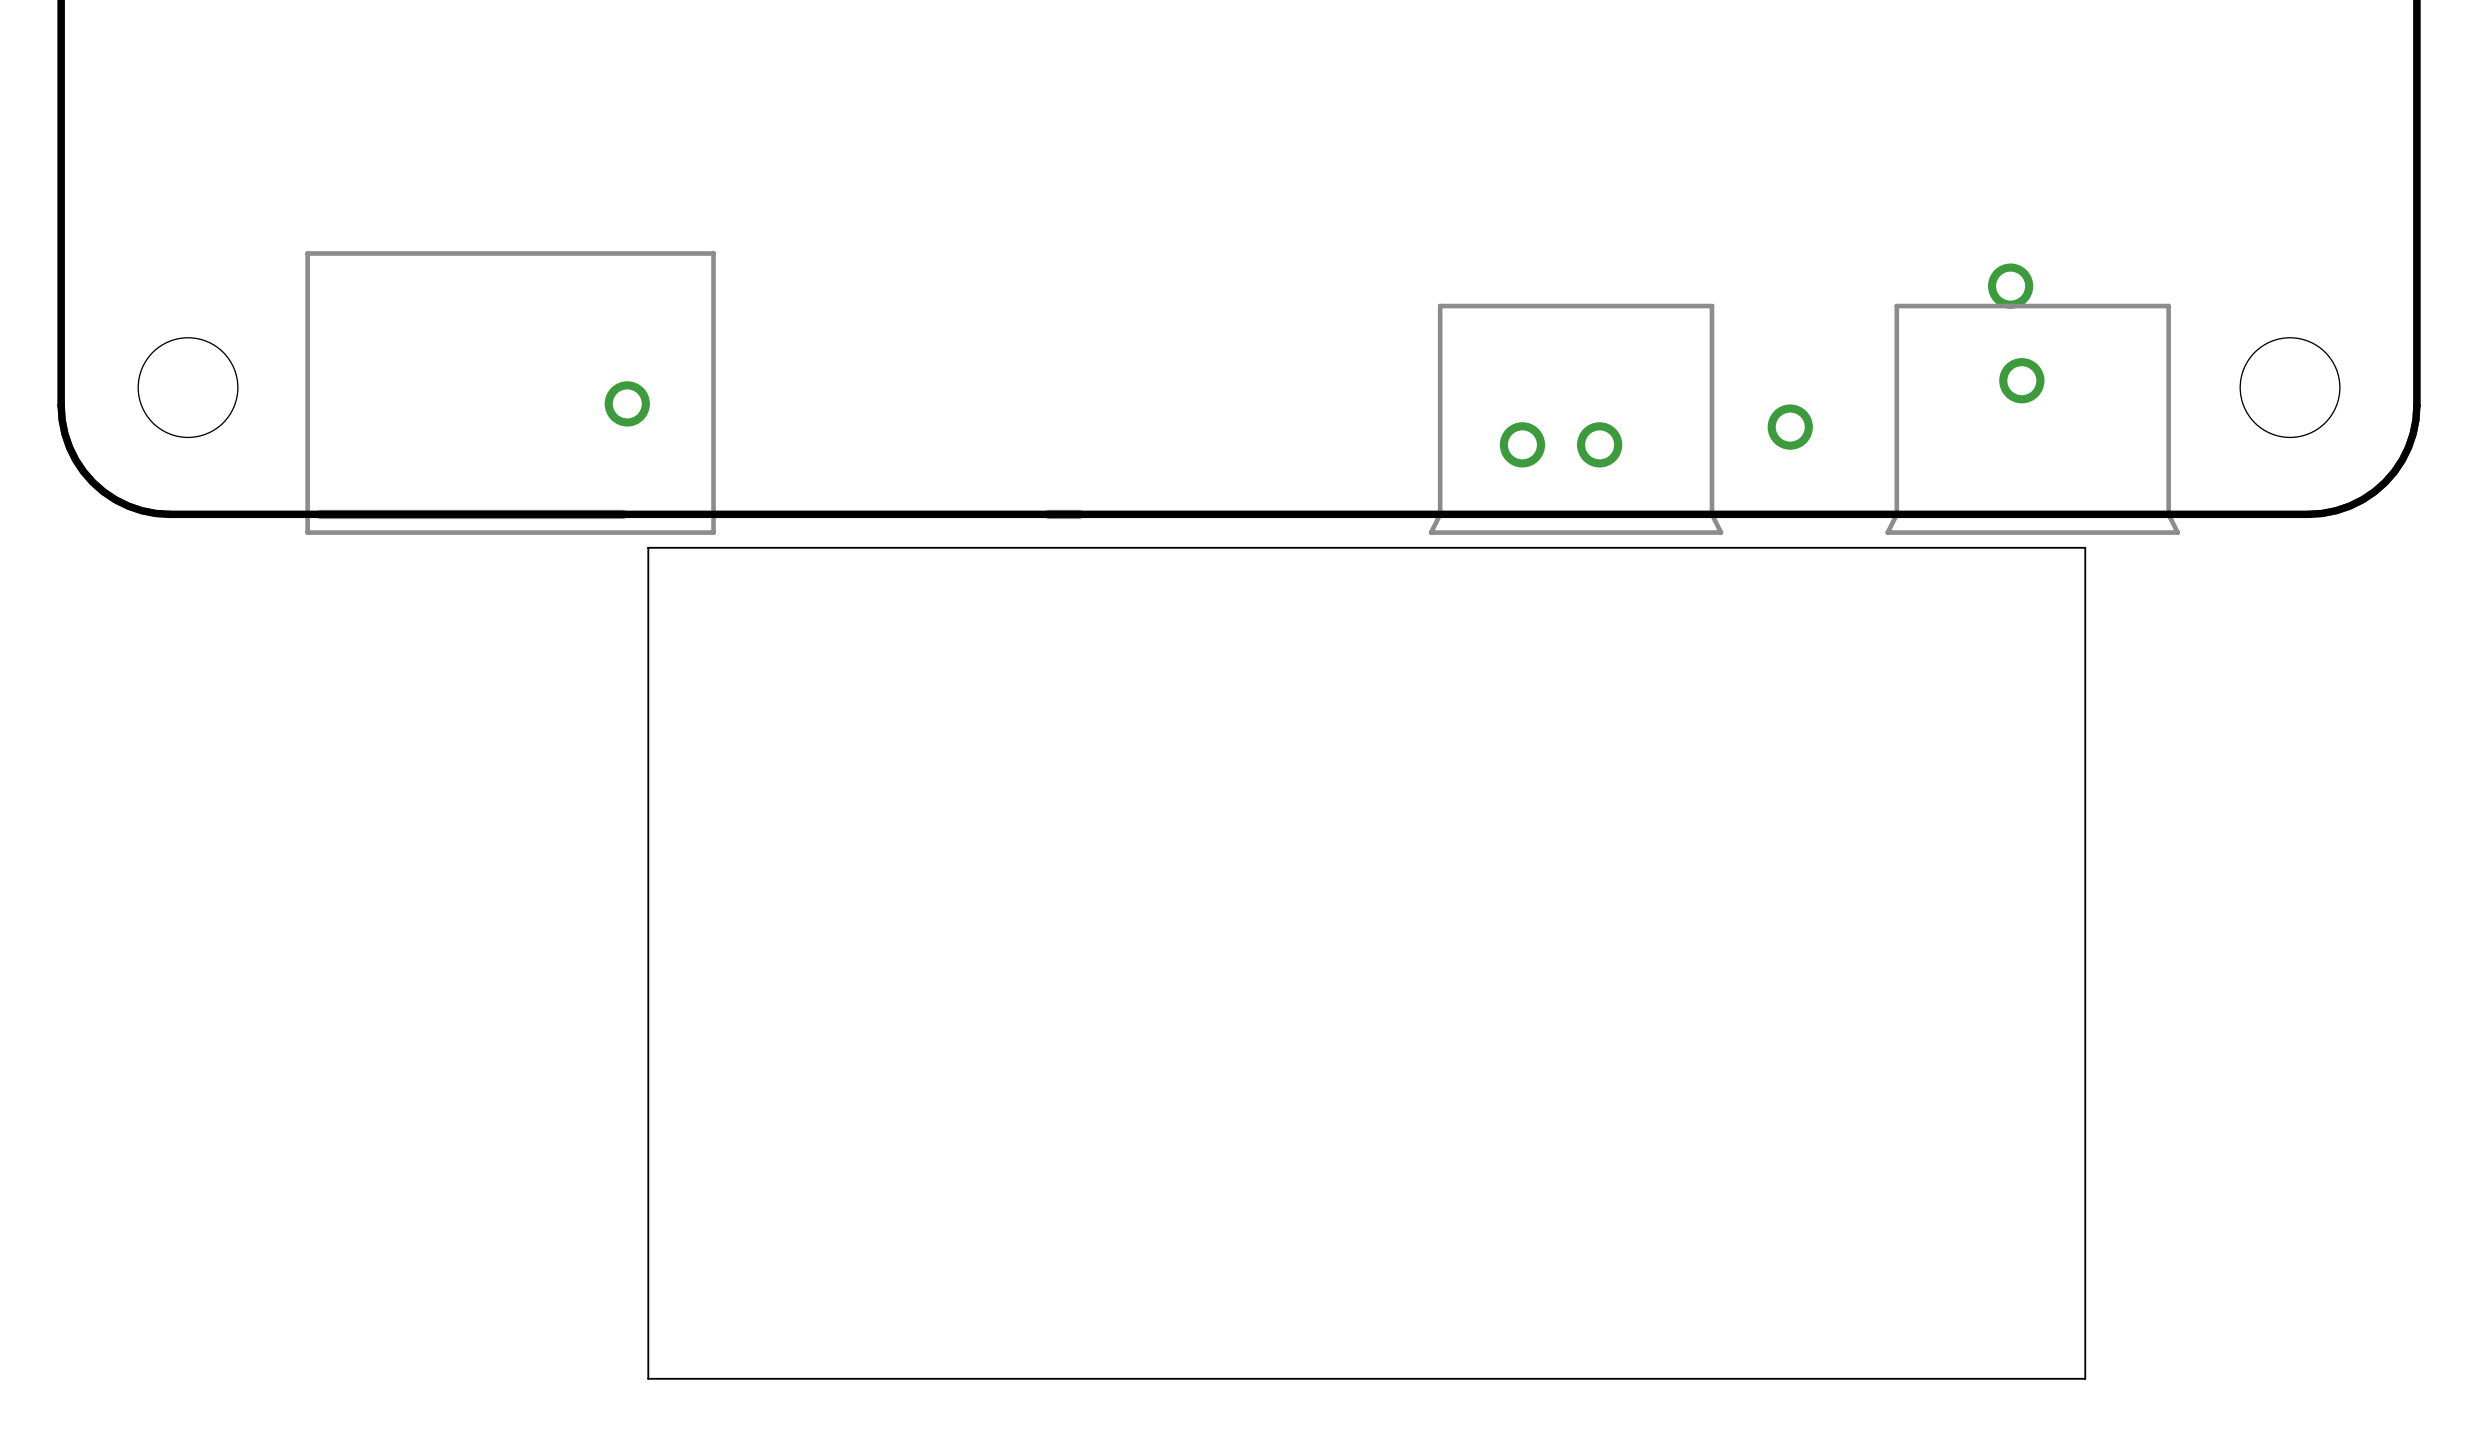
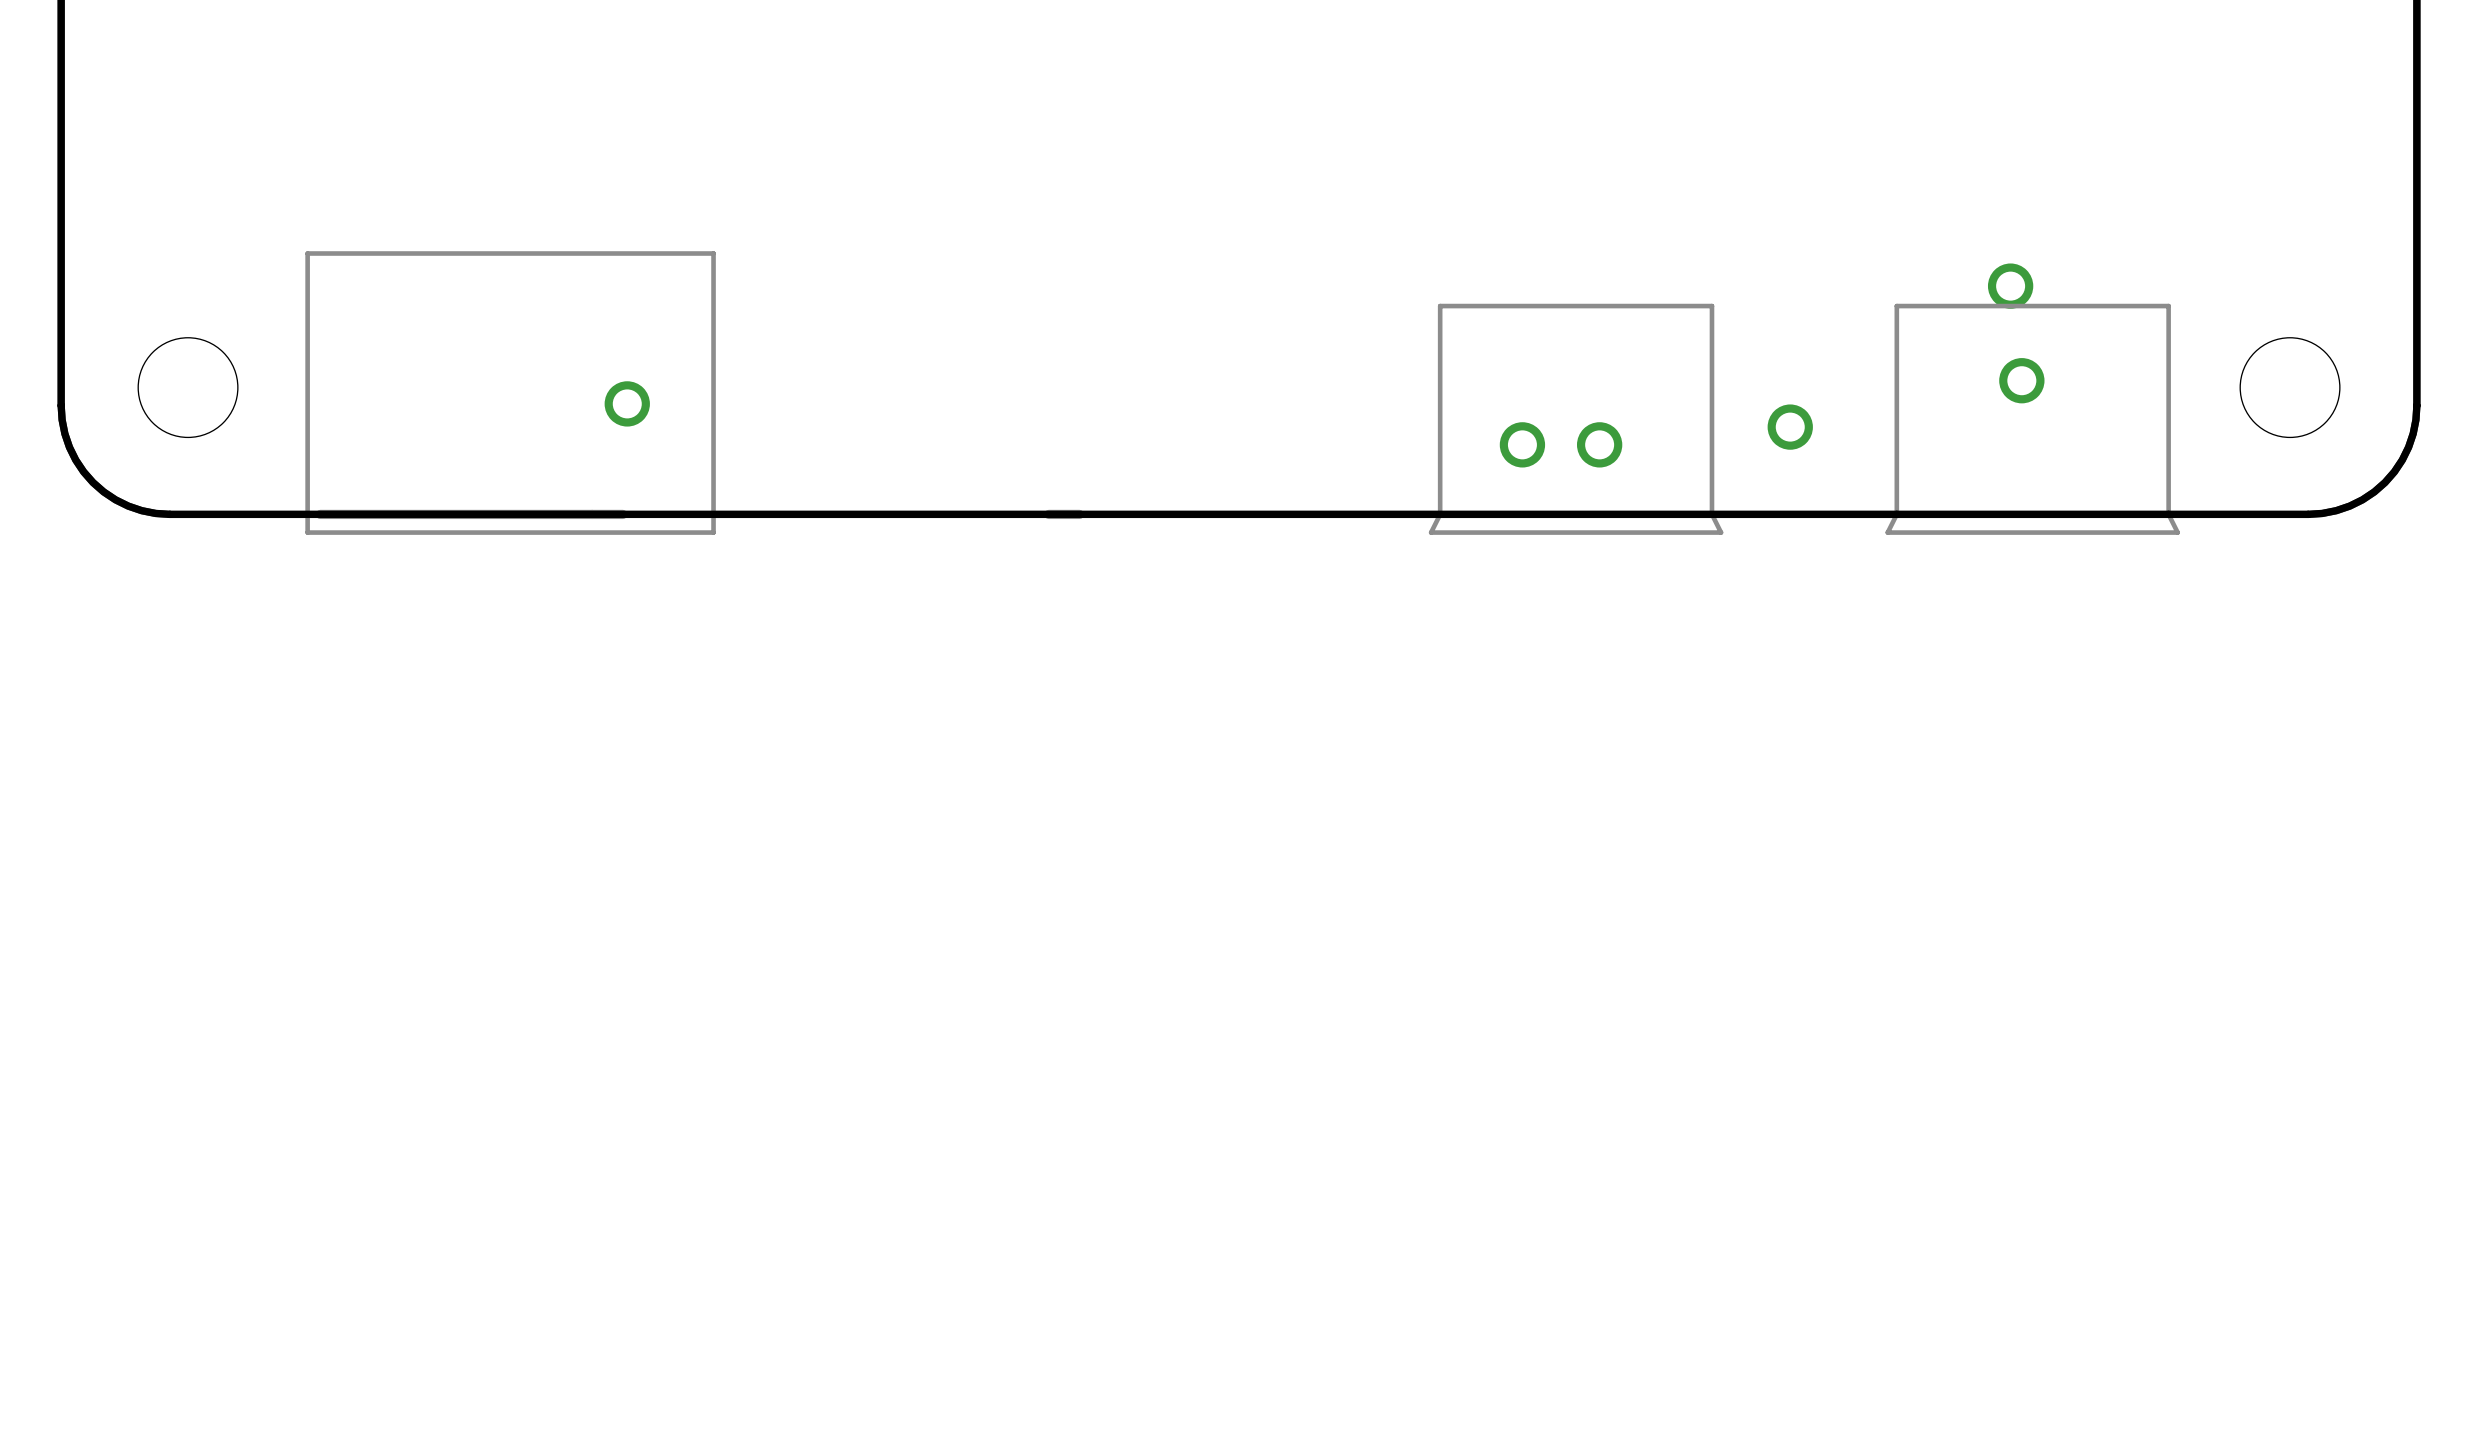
board edge: (2085, 547) (648, 547) (648, 1378) (2085, 1378) (2085, 547) -> none

